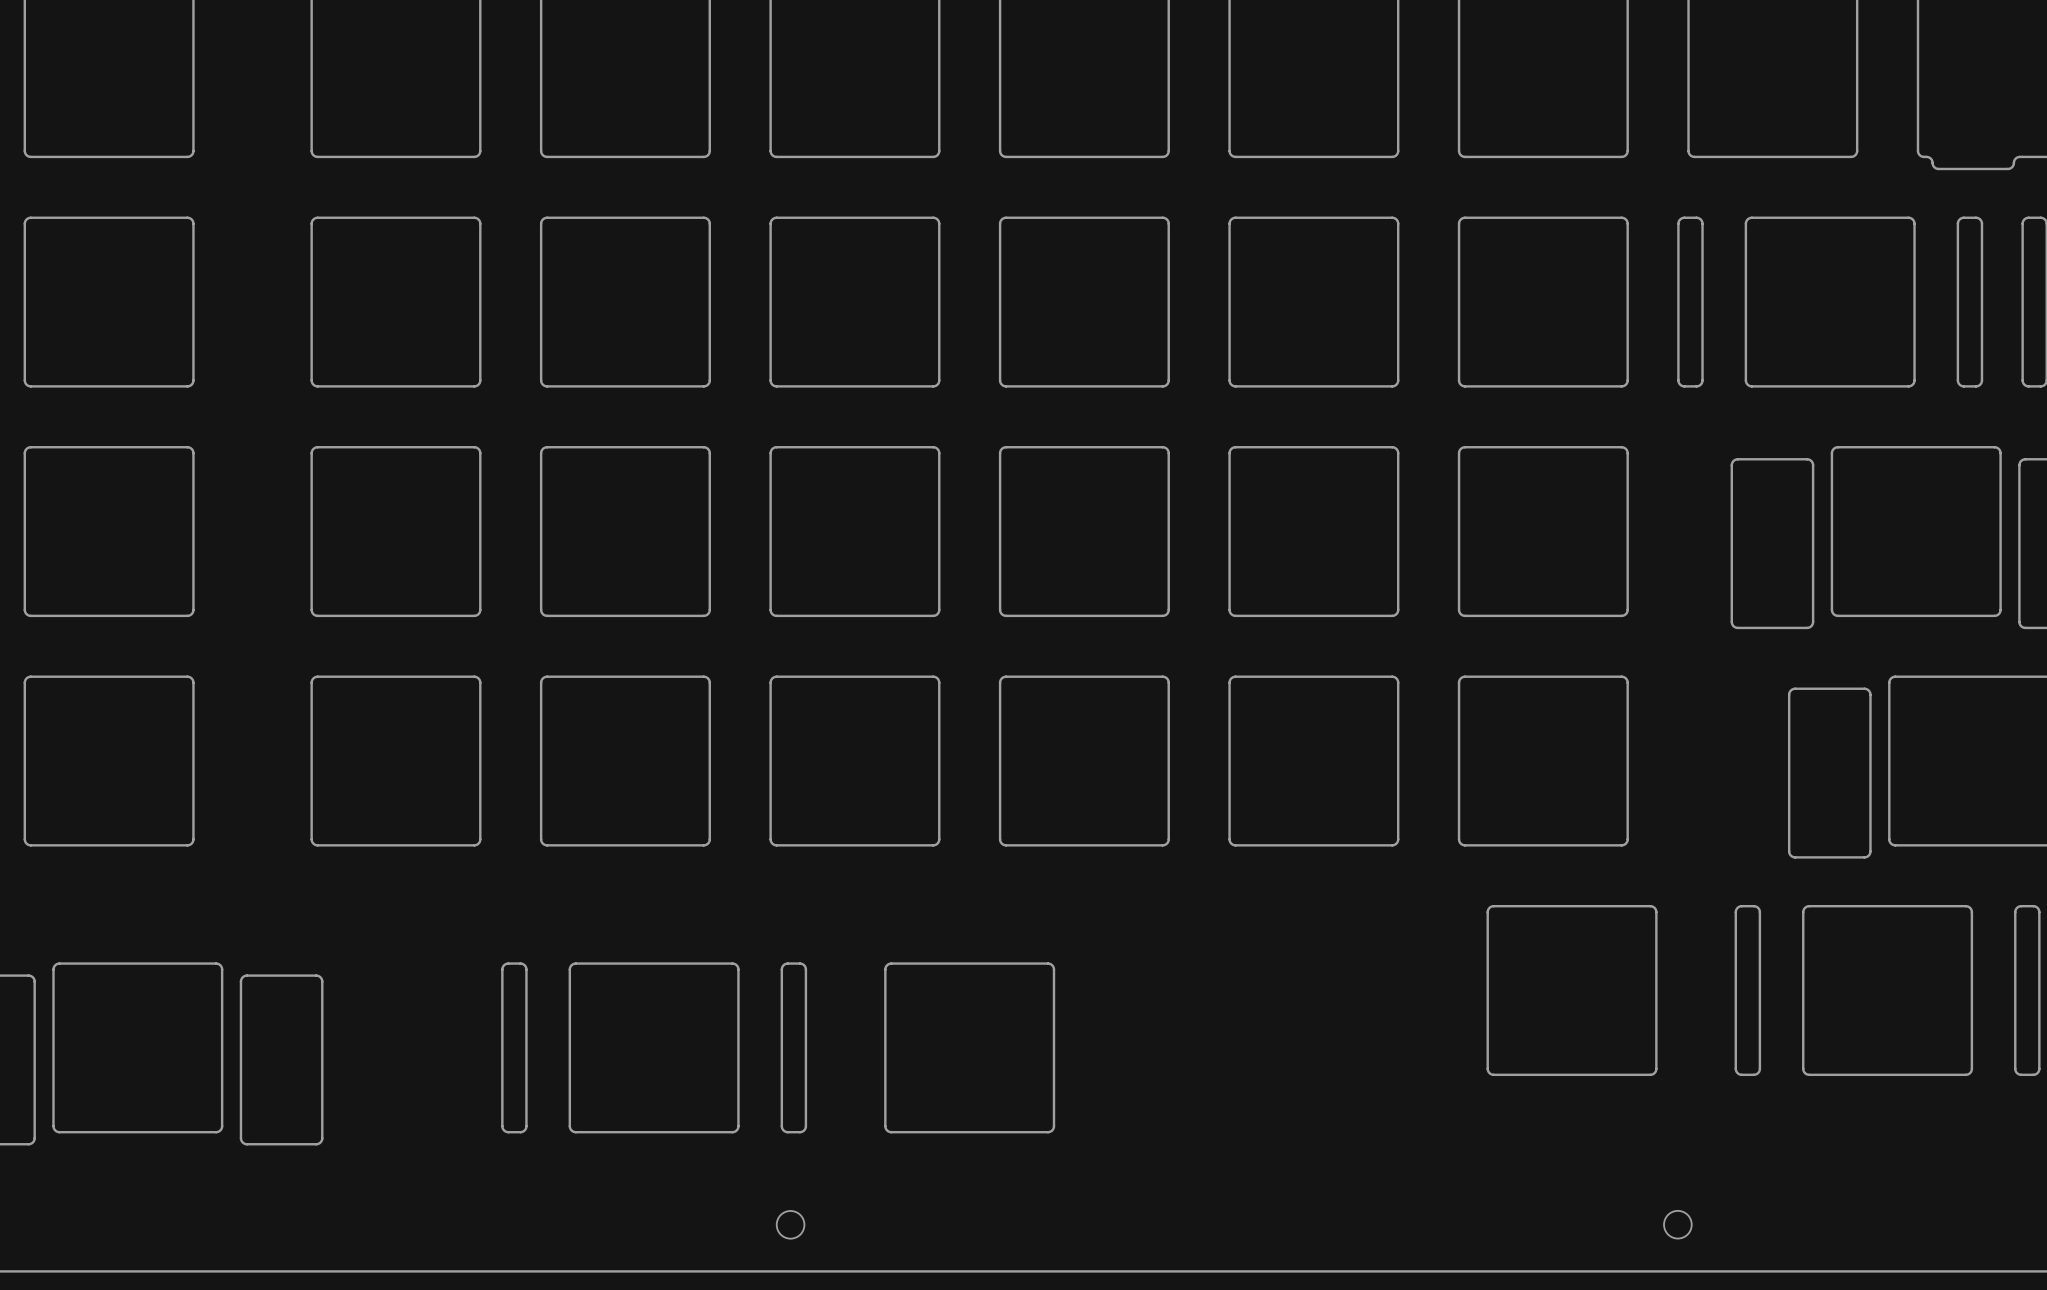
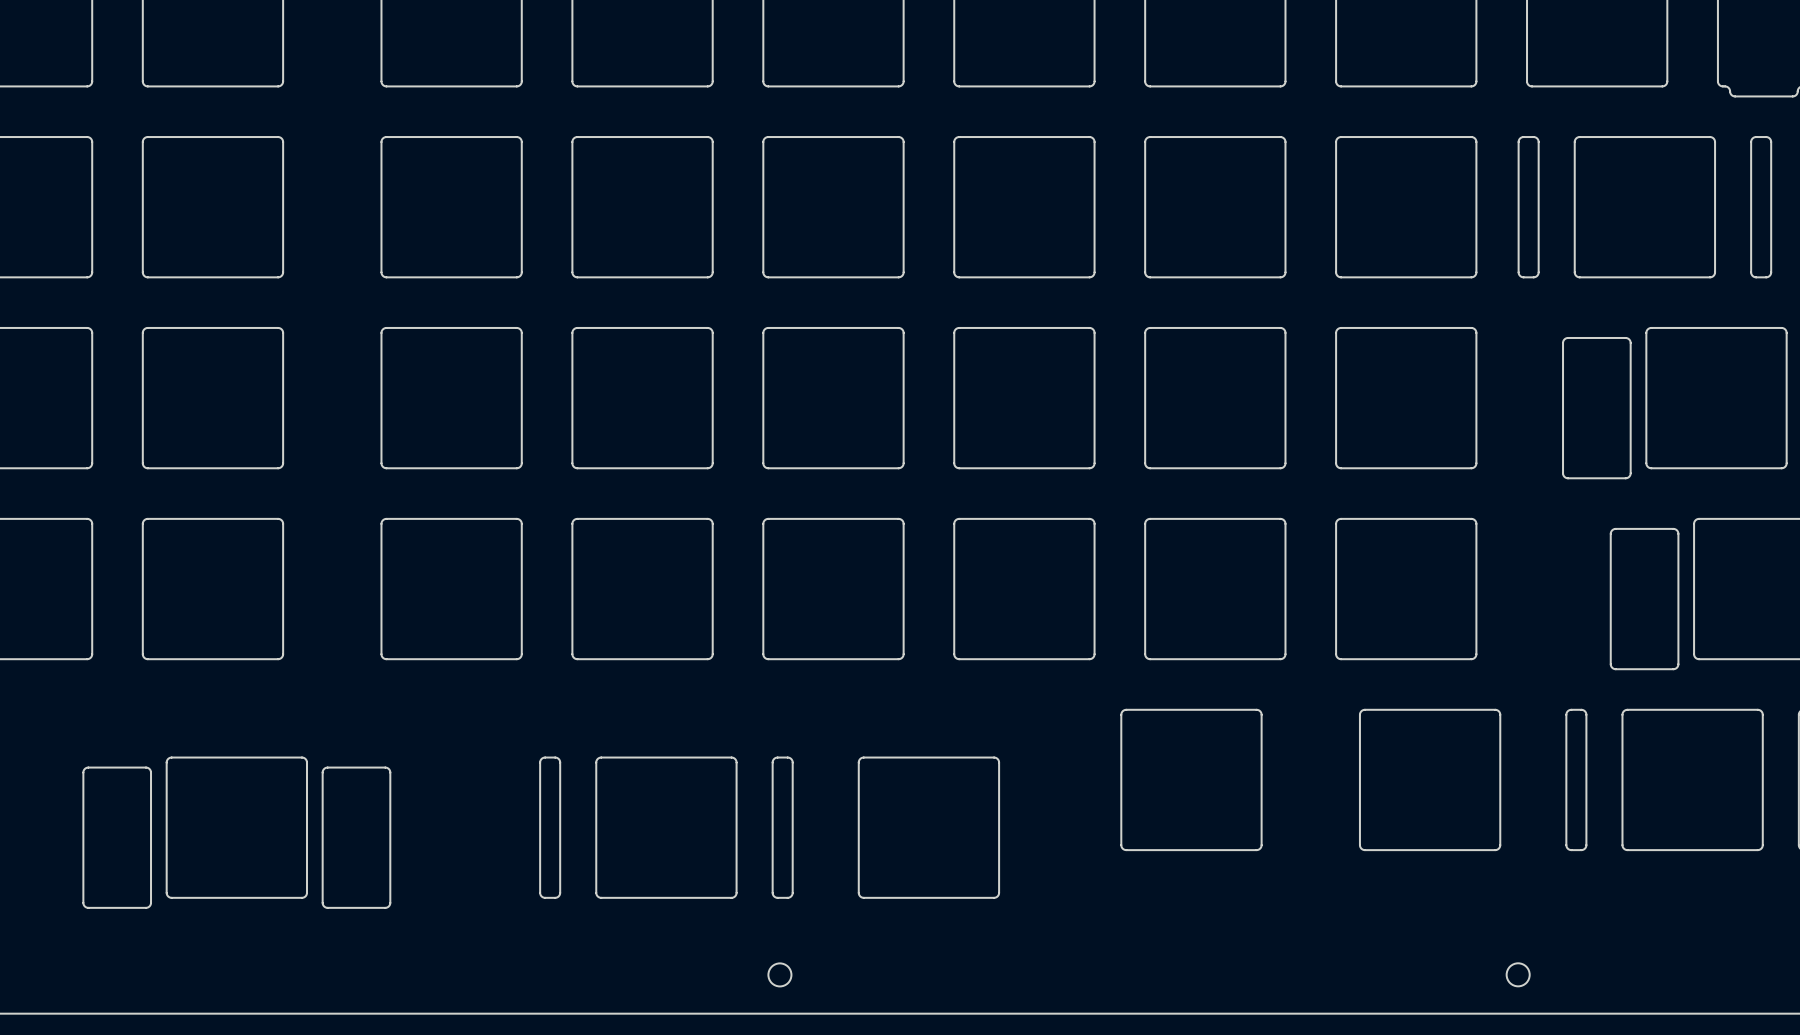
board edge: none -> (1256, 709) (1122, 711) (1122, 848) (1260, 848) (1261, 714) (1256, 709)

